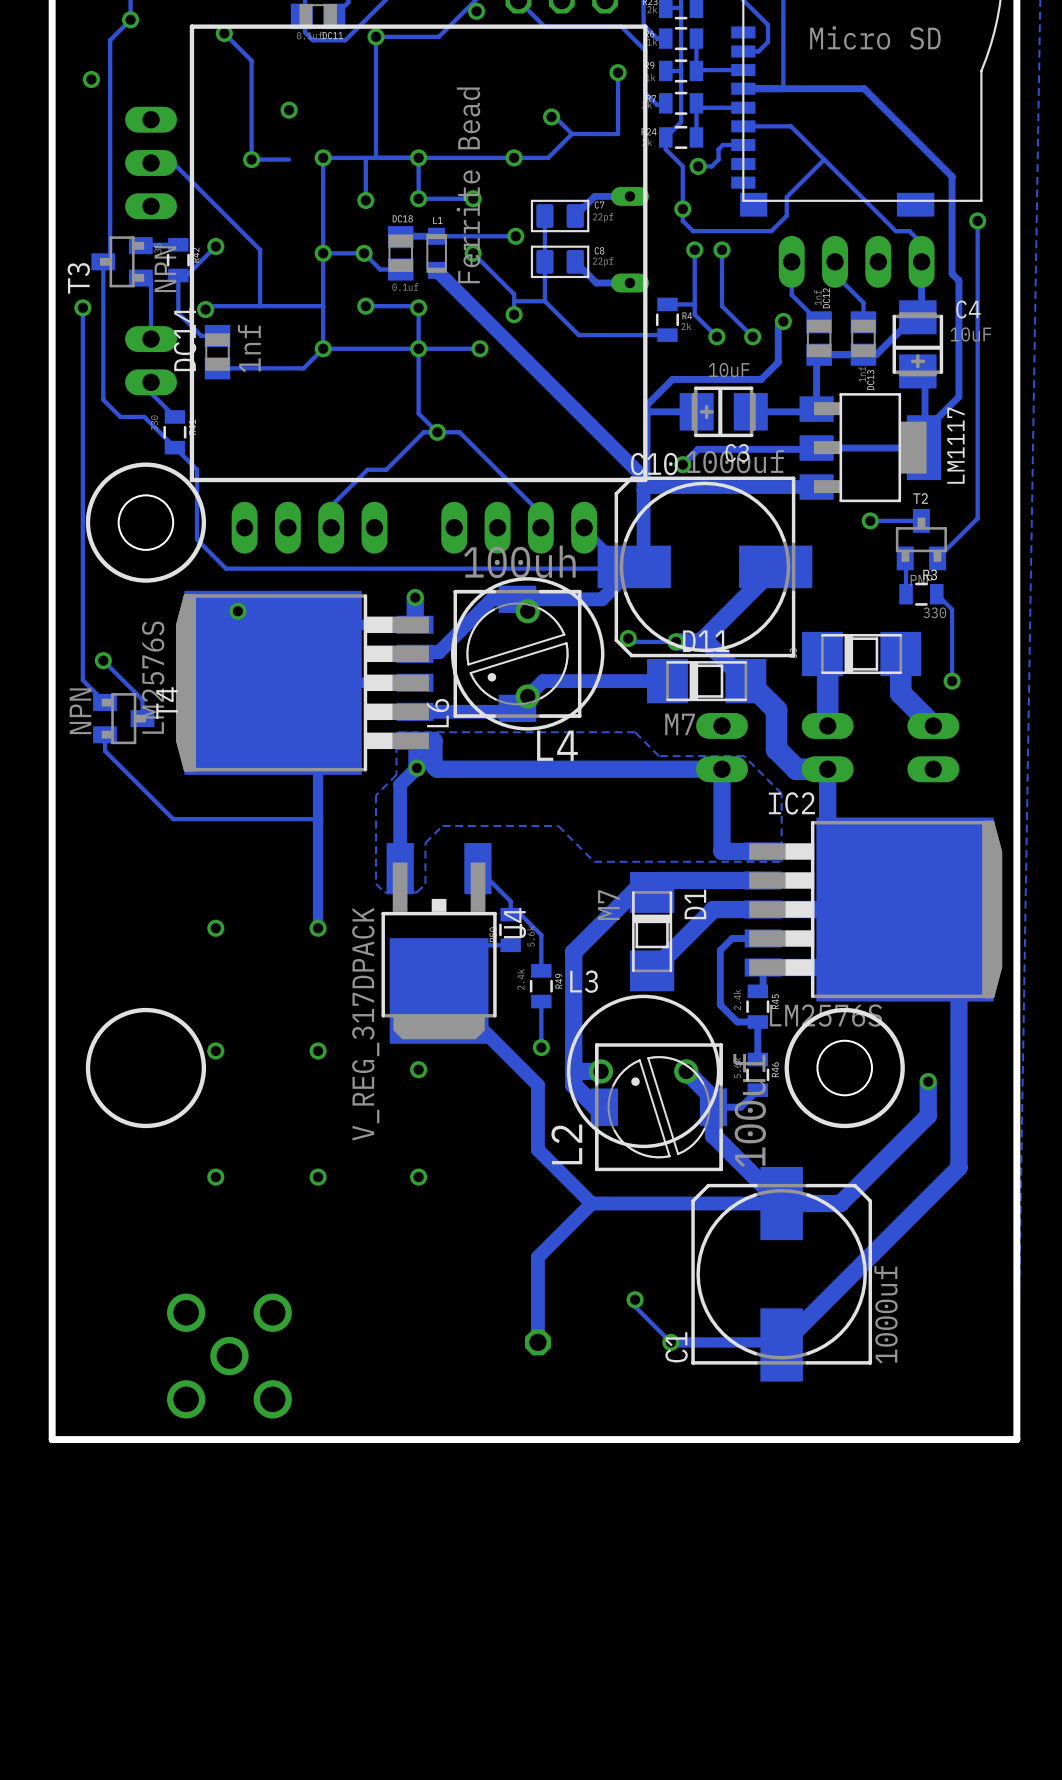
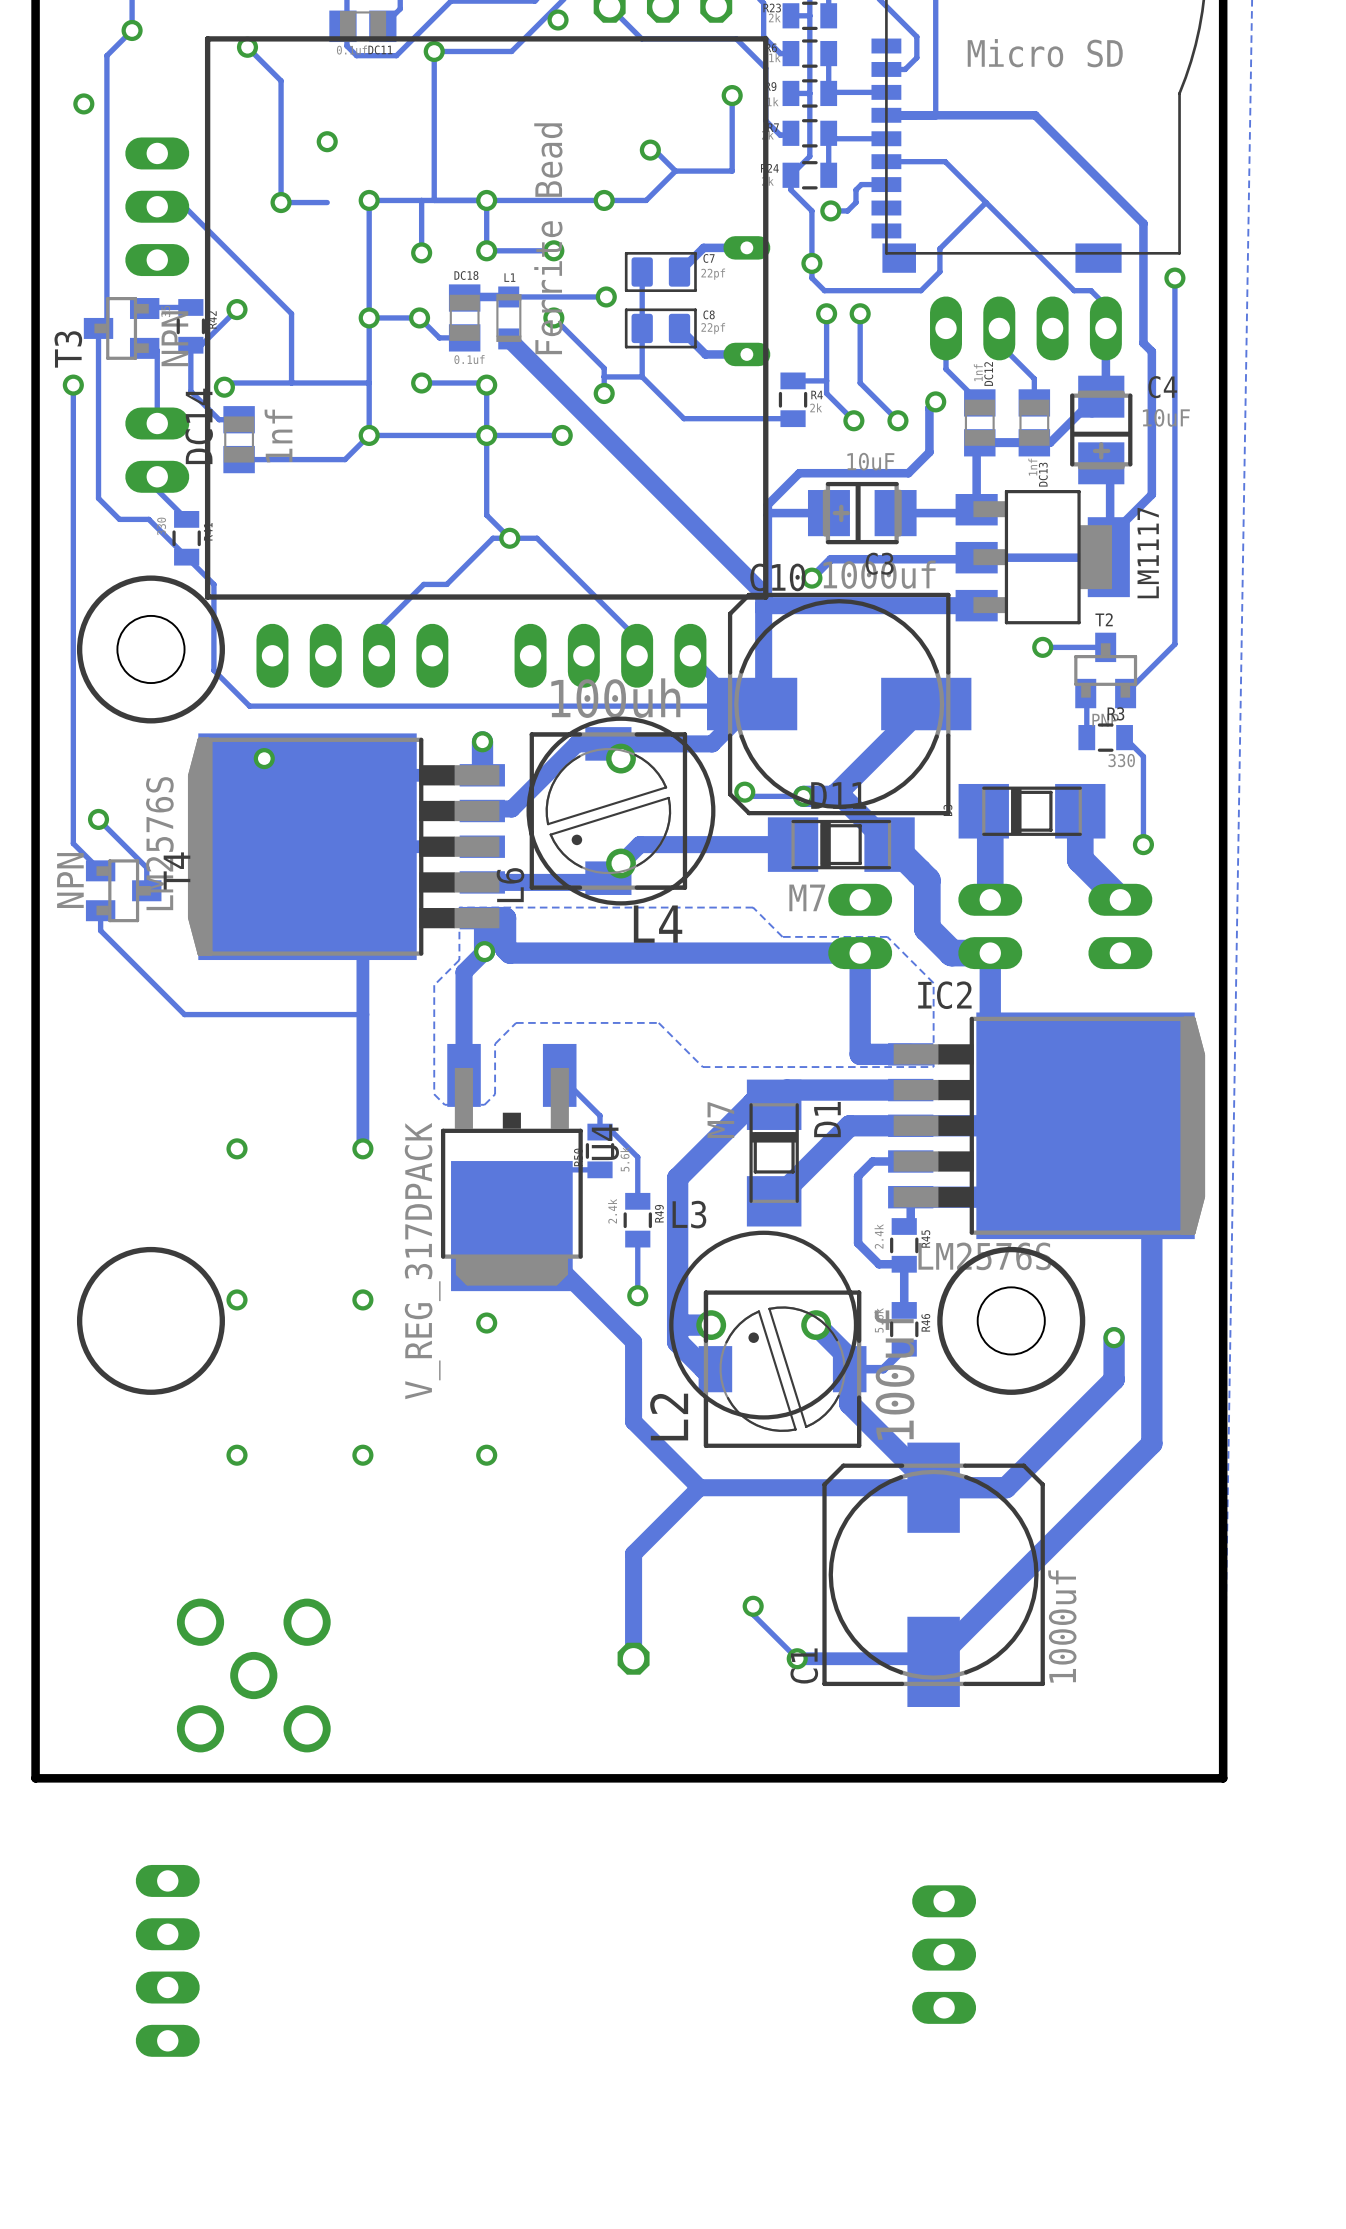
part: none -> (944, 1954)
part: none -> (167, 1960)

